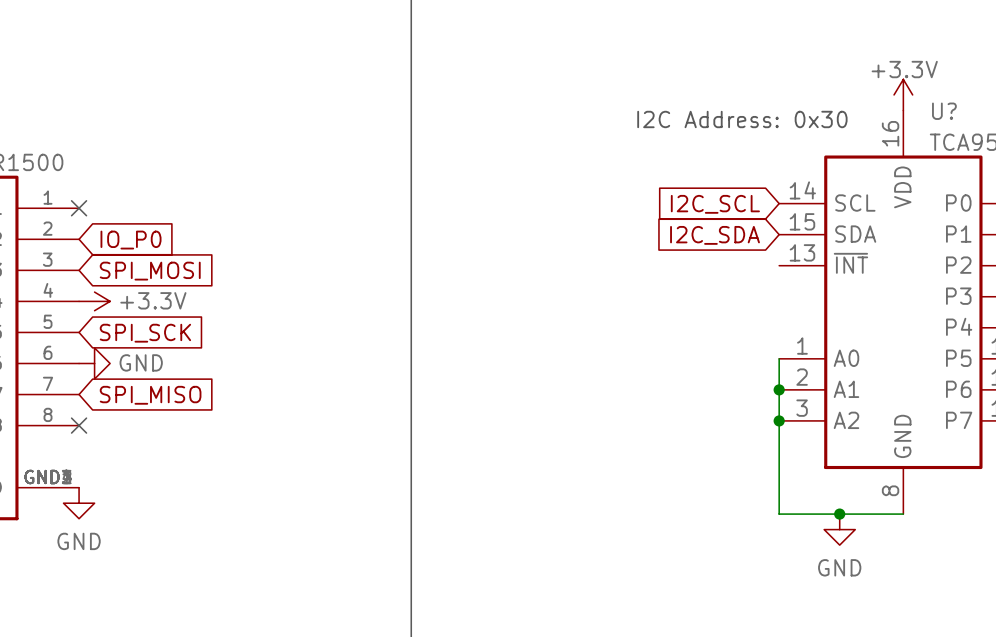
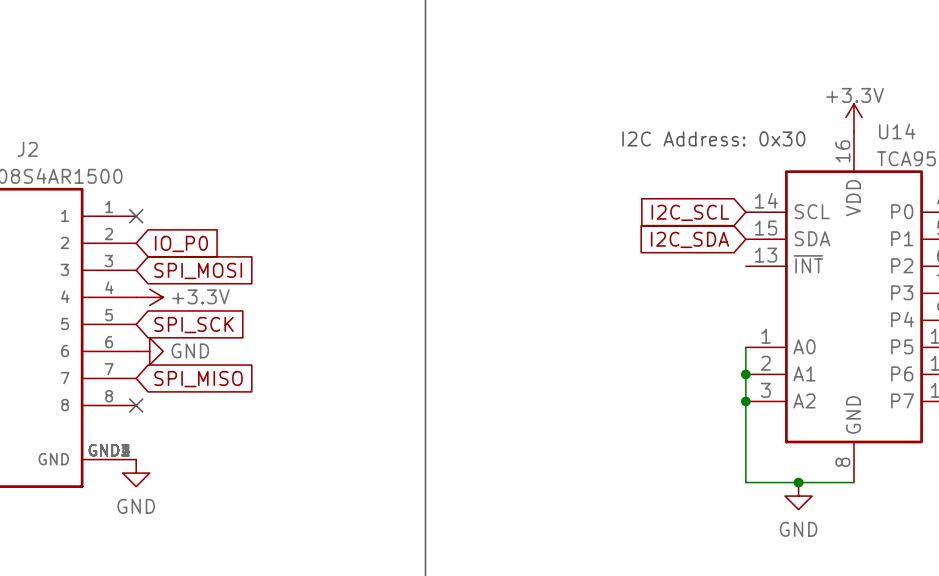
U? name: U? (944, 111) -> U14 (897, 131)

